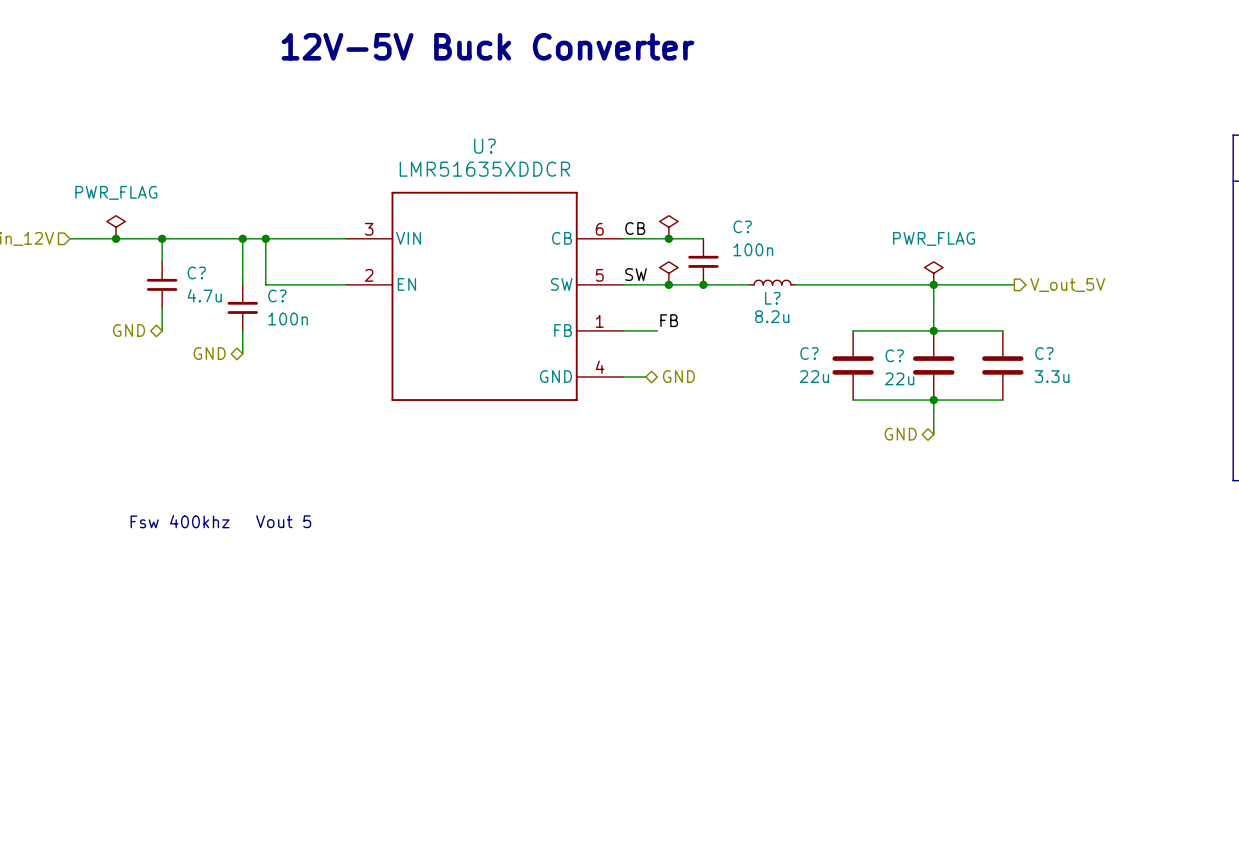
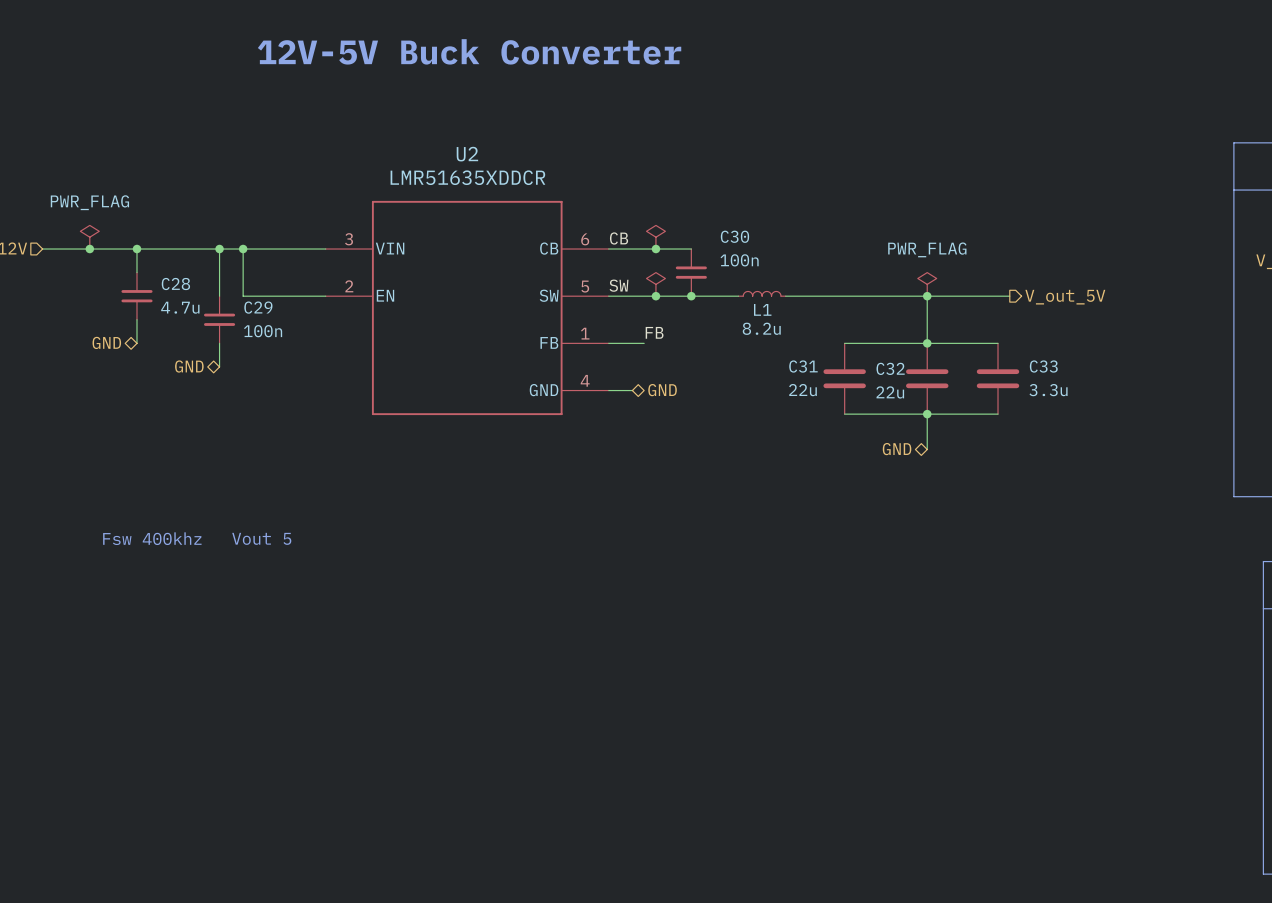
U? name: U? (484, 146) -> U2 (467, 154)
C? name: C? (742, 226) -> C30 (734, 236)
C? name: C? (196, 272) -> C28 (175, 284)
C? name: C? (277, 296) -> C29 (258, 307)
L? name: L? (772, 298) -> L1 (762, 309)
C? name: C? (809, 353) -> C31 (803, 366)
C? name: C? (1044, 353) -> C33 (1043, 366)
C? name: C? (894, 355) -> C32 (890, 368)

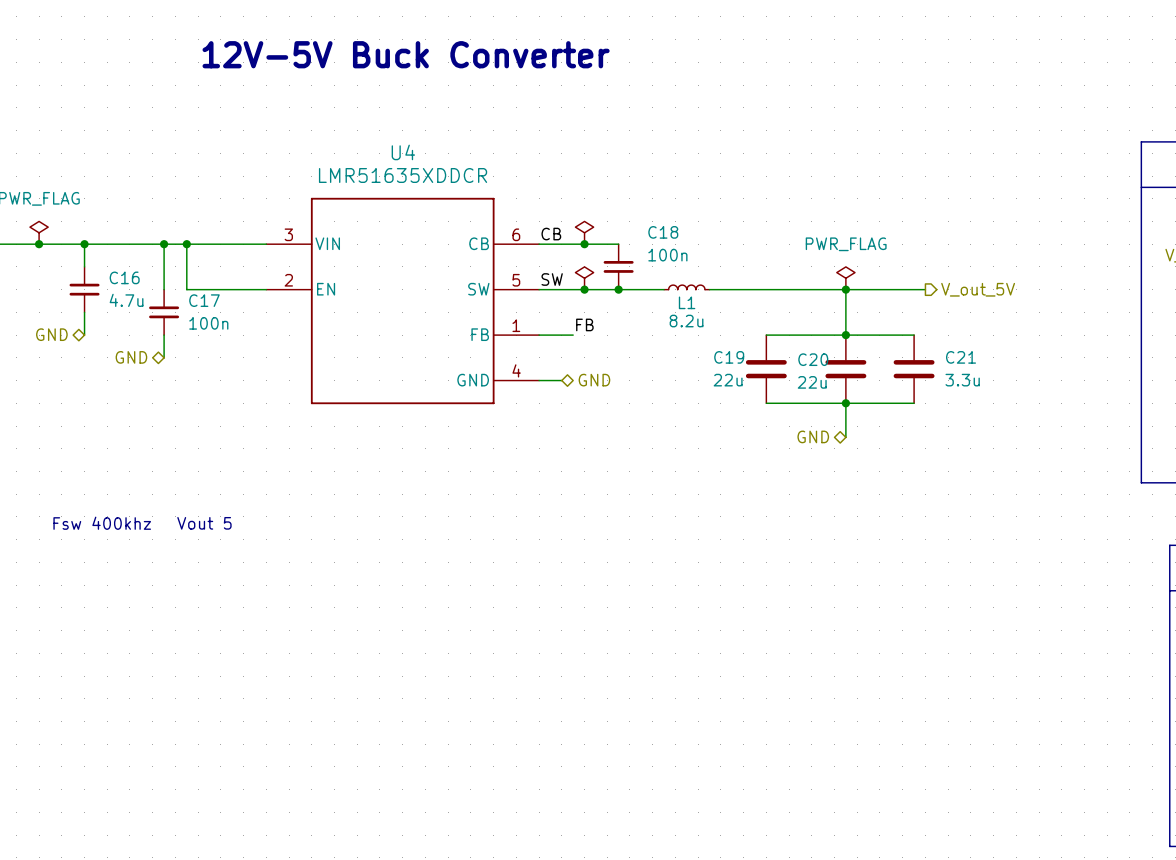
U2 name: U2 (467, 154) -> U4 (403, 152)
C30 name: C30 (734, 236) -> C18 (663, 232)
C28 name: C28 (175, 284) -> C16 (124, 277)
C29 name: C29 (258, 307) -> C17 (204, 300)
C31 name: C31 (803, 366) -> C19 (729, 357)
C33 name: C33 (1043, 366) -> C21 (961, 357)
C32 name: C32 (890, 368) -> C20 (813, 359)

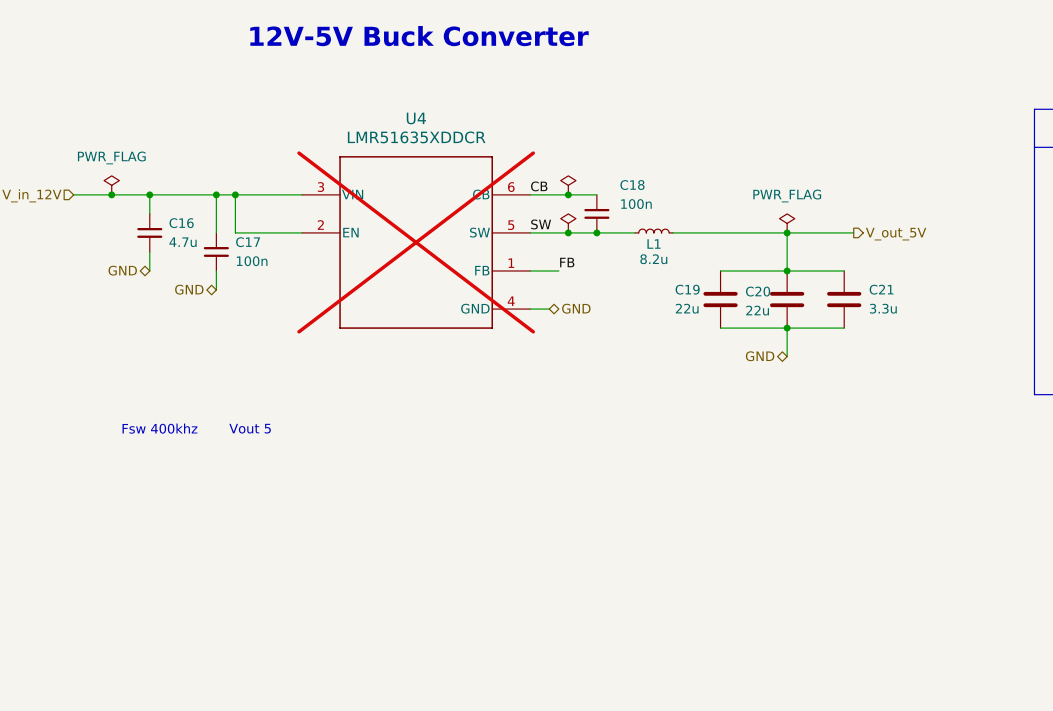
U4 do-not-place cross: none -> (416, 242)

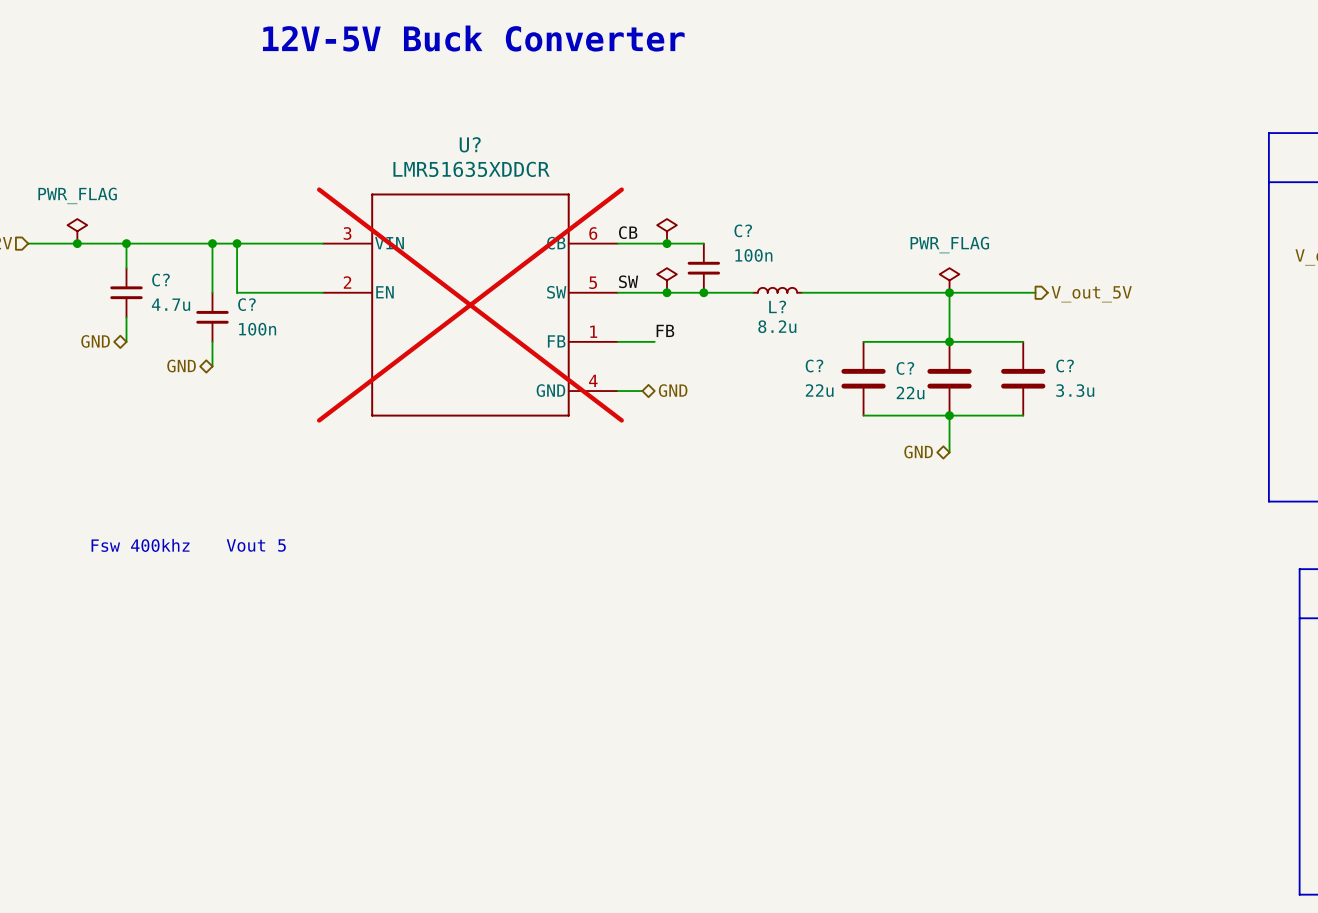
U4 name: U4 (416, 118) -> U? (470, 144)
C18 name: C18 (632, 185) -> C? (743, 230)
C16 name: C16 (181, 223) -> C? (160, 280)
C17 name: C17 (248, 242) -> C? (246, 304)
L1 name: L1 (653, 244) -> L? (777, 306)
C19 name: C19 (687, 289) -> C? (814, 366)
C21 name: C21 (881, 289) -> C? (1065, 366)
C20 name: C20 (758, 291) -> C? (905, 368)

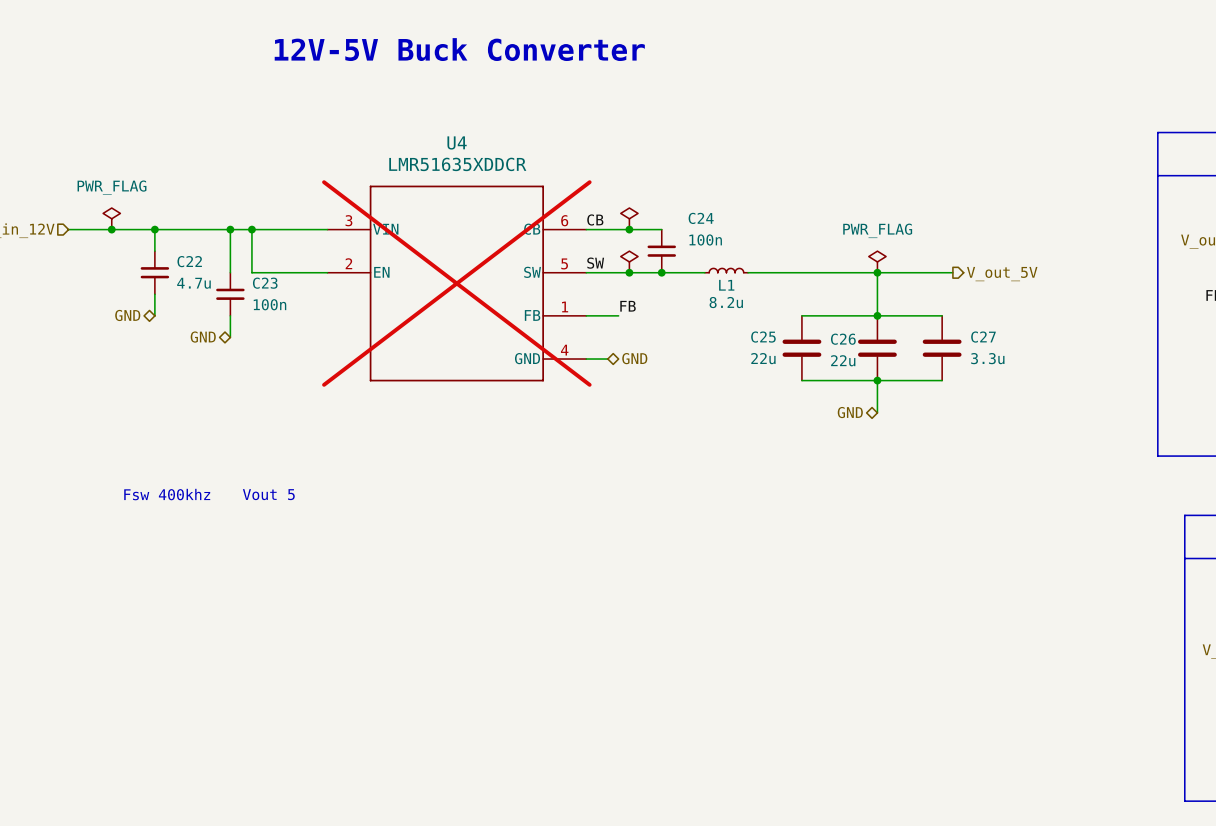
U? name: U? (470, 144) -> U4 (457, 142)
C? name: C? (743, 230) -> C24 (701, 218)
C? name: C? (160, 280) -> C22 (189, 261)
C? name: C? (246, 304) -> C23 (265, 283)
L? name: L? (777, 306) -> L1 (726, 285)
C? name: C? (814, 366) -> C25 (763, 337)
C? name: C? (1065, 366) -> C27 (983, 337)
C? name: C? (905, 368) -> C26 (843, 339)

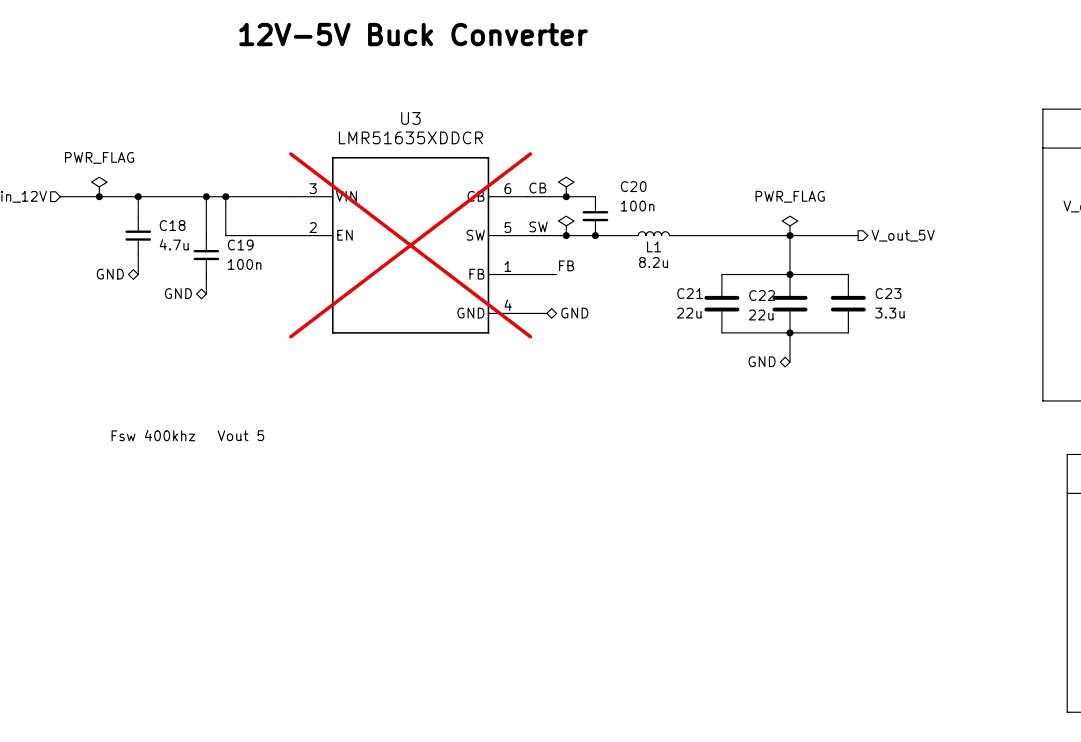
U4 name: U4 (457, 142) -> U3 (410, 118)
C24 name: C24 (701, 218) -> C20 (633, 186)
C22 name: C22 (189, 261) -> C18 (172, 225)
C23 name: C23 (265, 283) -> C19 (240, 245)
C25 name: C25 (763, 337) -> C21 (690, 293)
C27 name: C27 (983, 337) -> C23 (888, 293)
C26 name: C26 (843, 339) -> C22 (762, 295)

